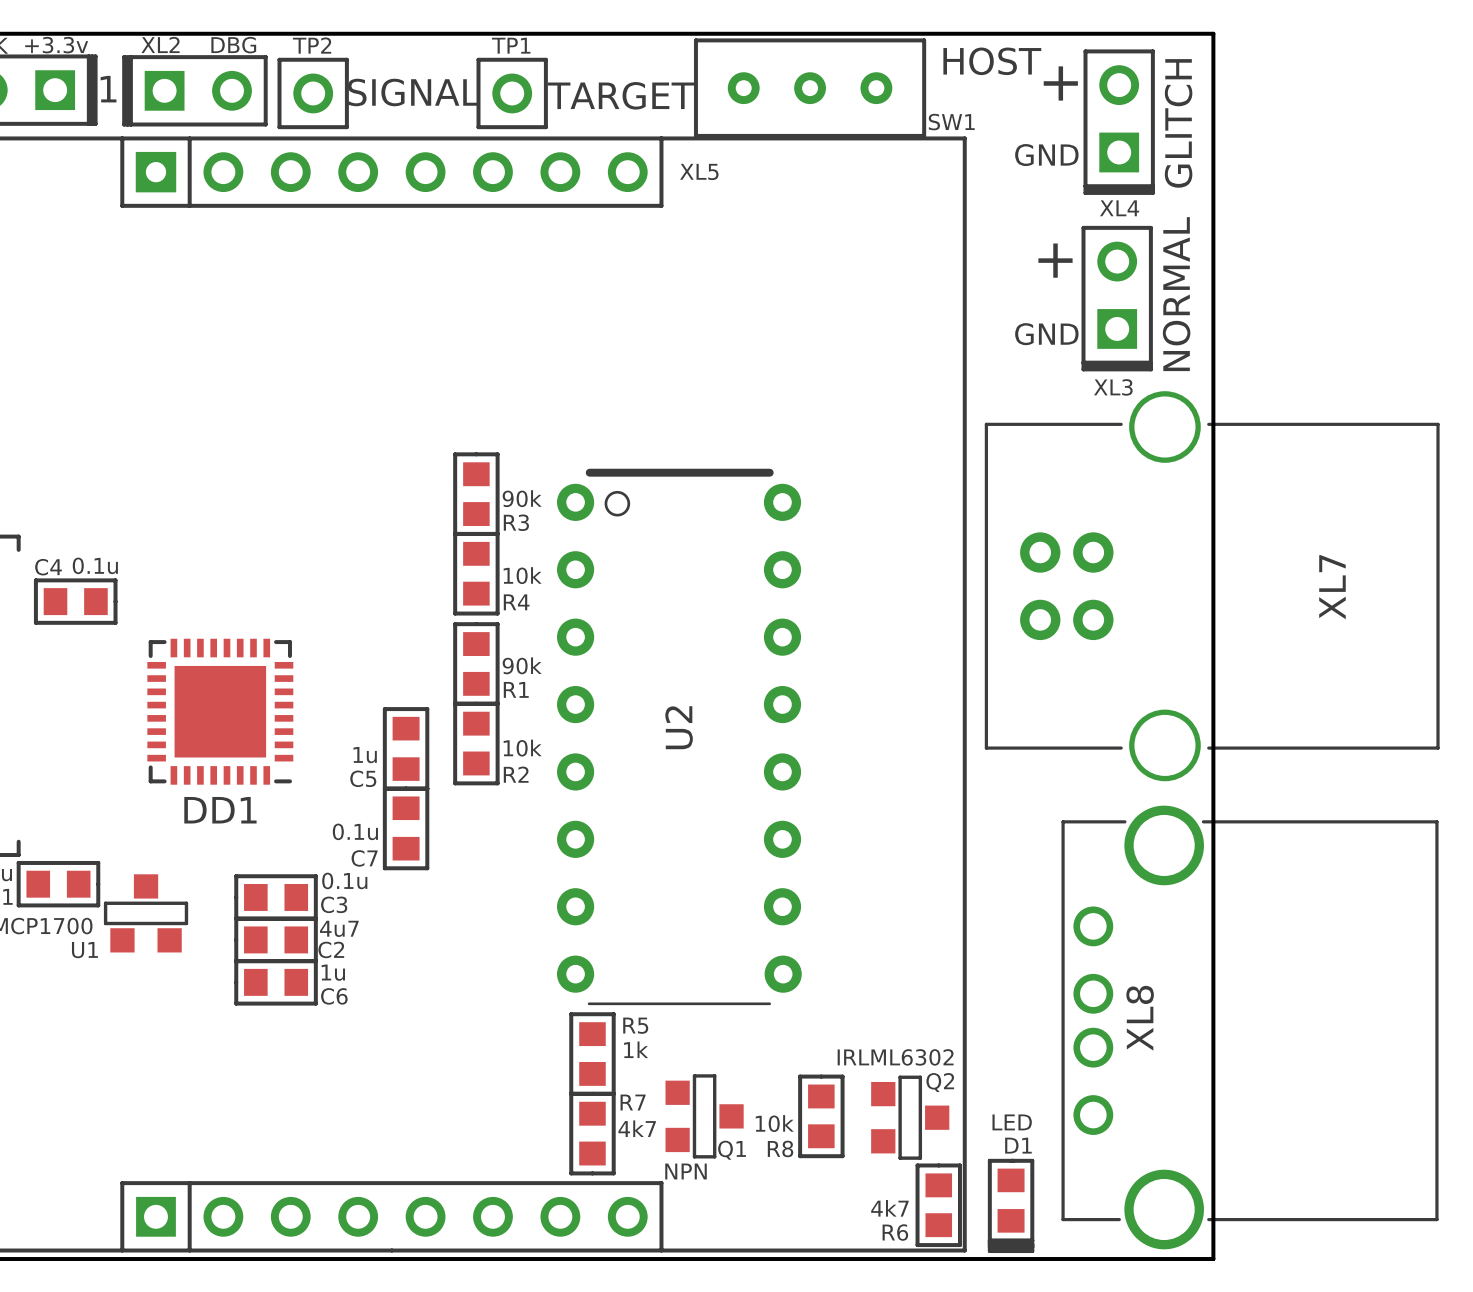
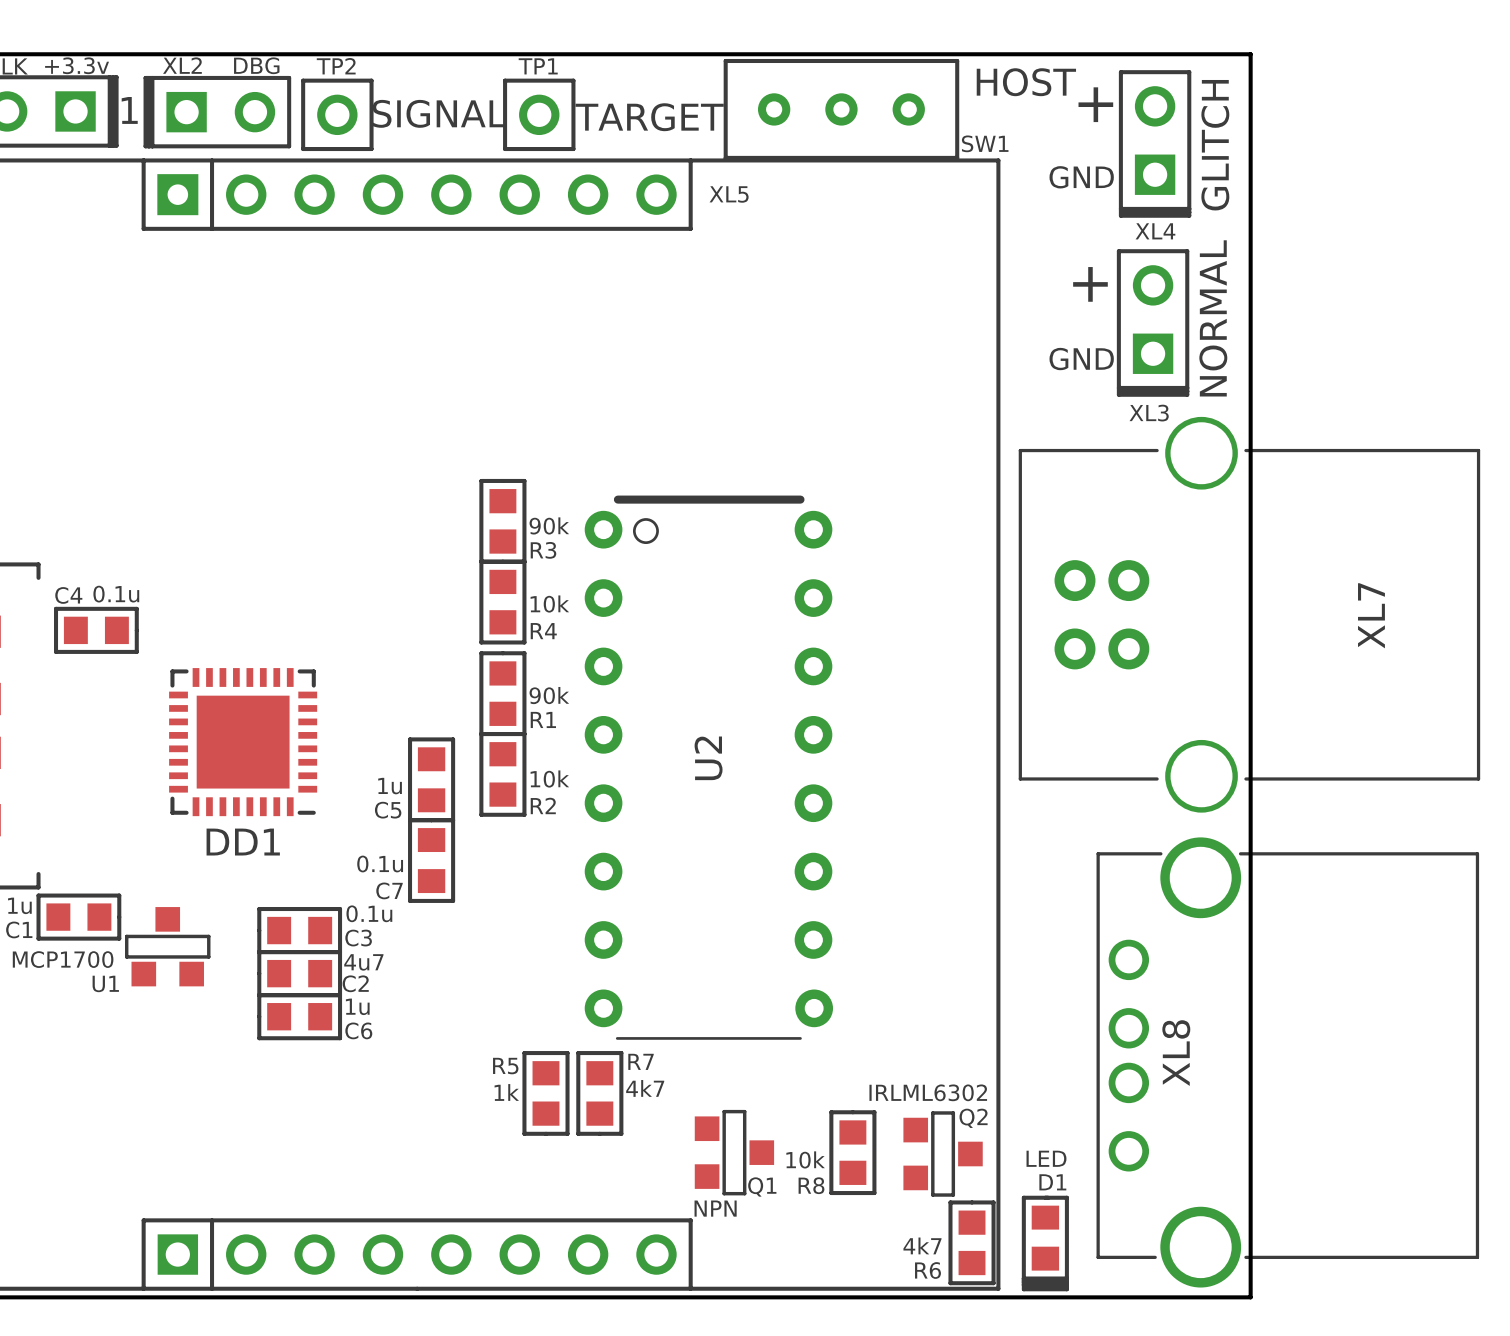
R5 name position: R5 (635, 1025) -> R5 (505, 1066)
R5 value position: 1k (636, 1049) -> 1k (506, 1092)
R5 position: (592, 1054) -> (545, 1093)
R7 position: (592, 1133) -> (599, 1093)

